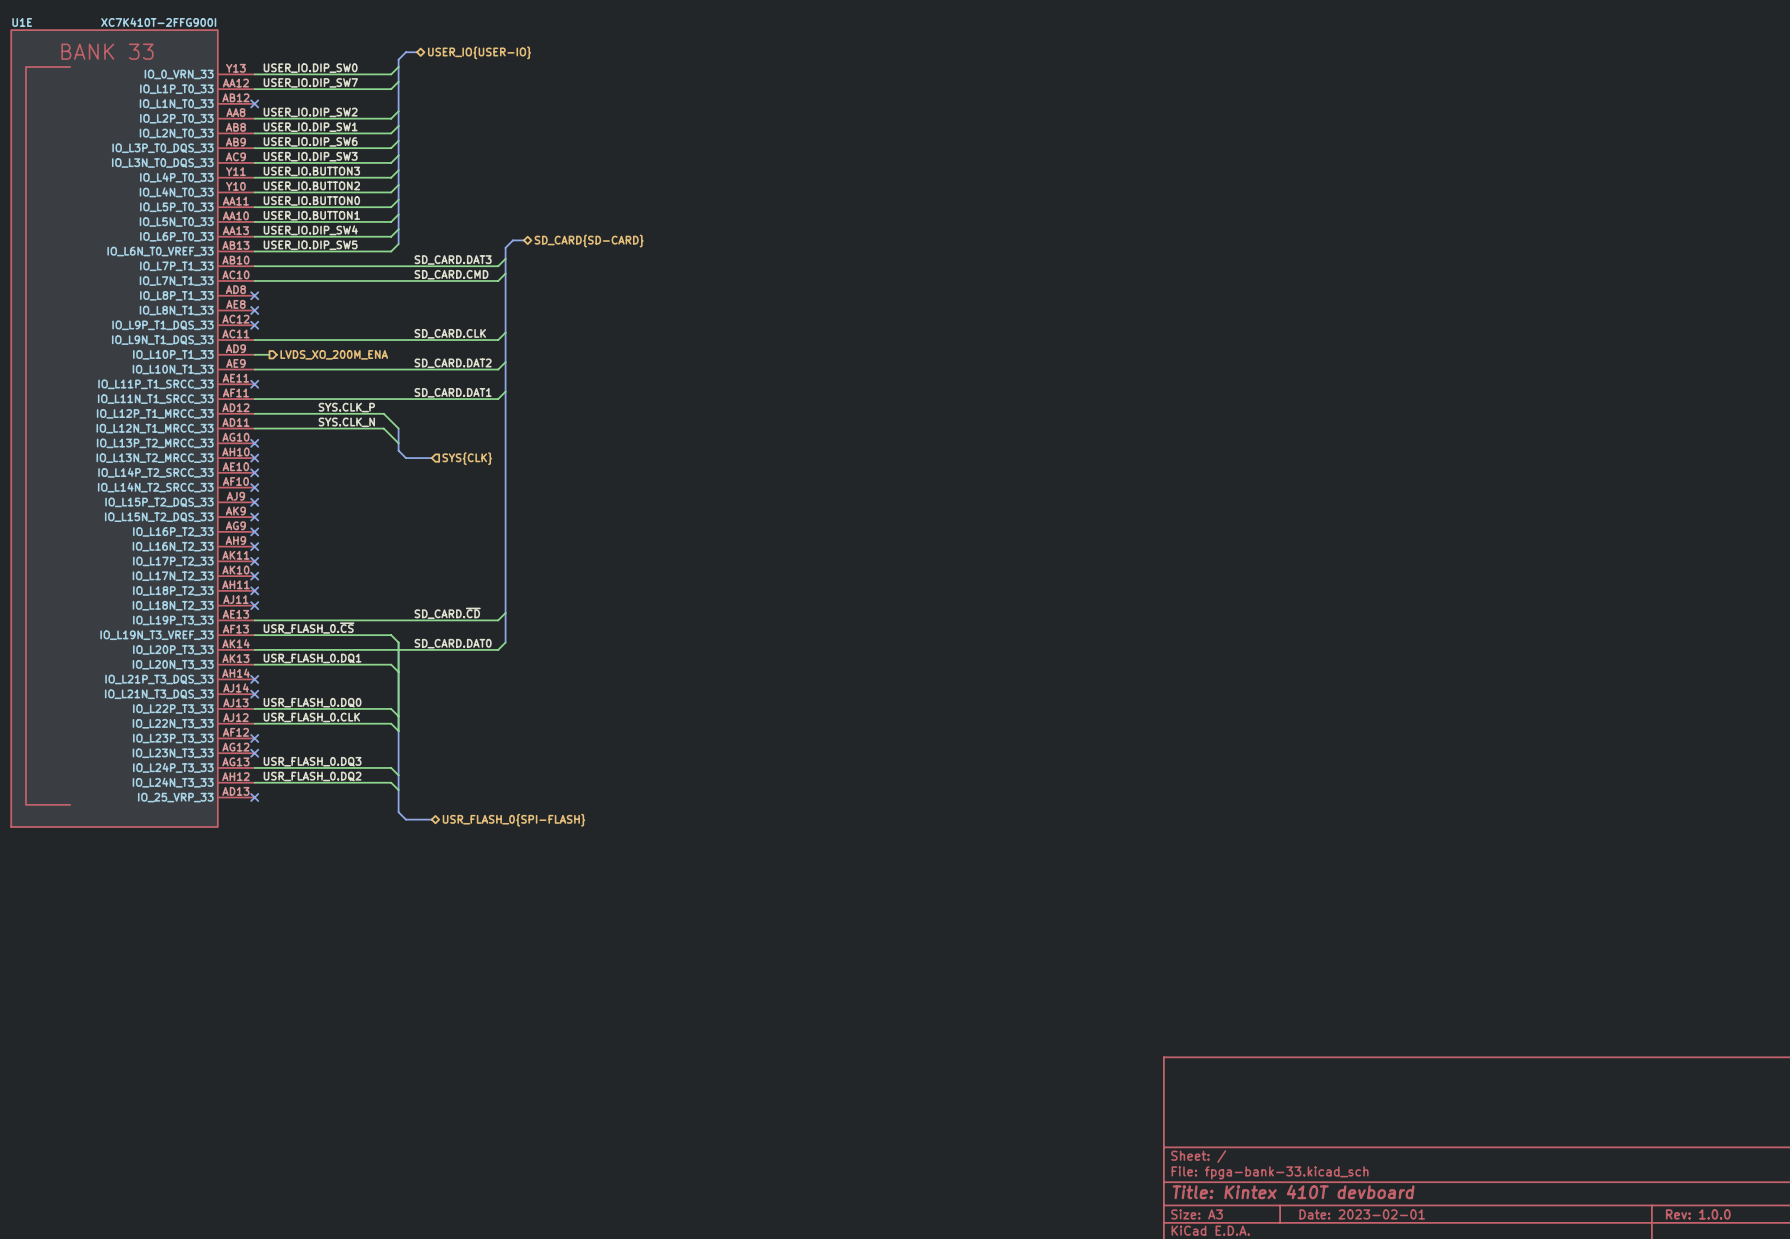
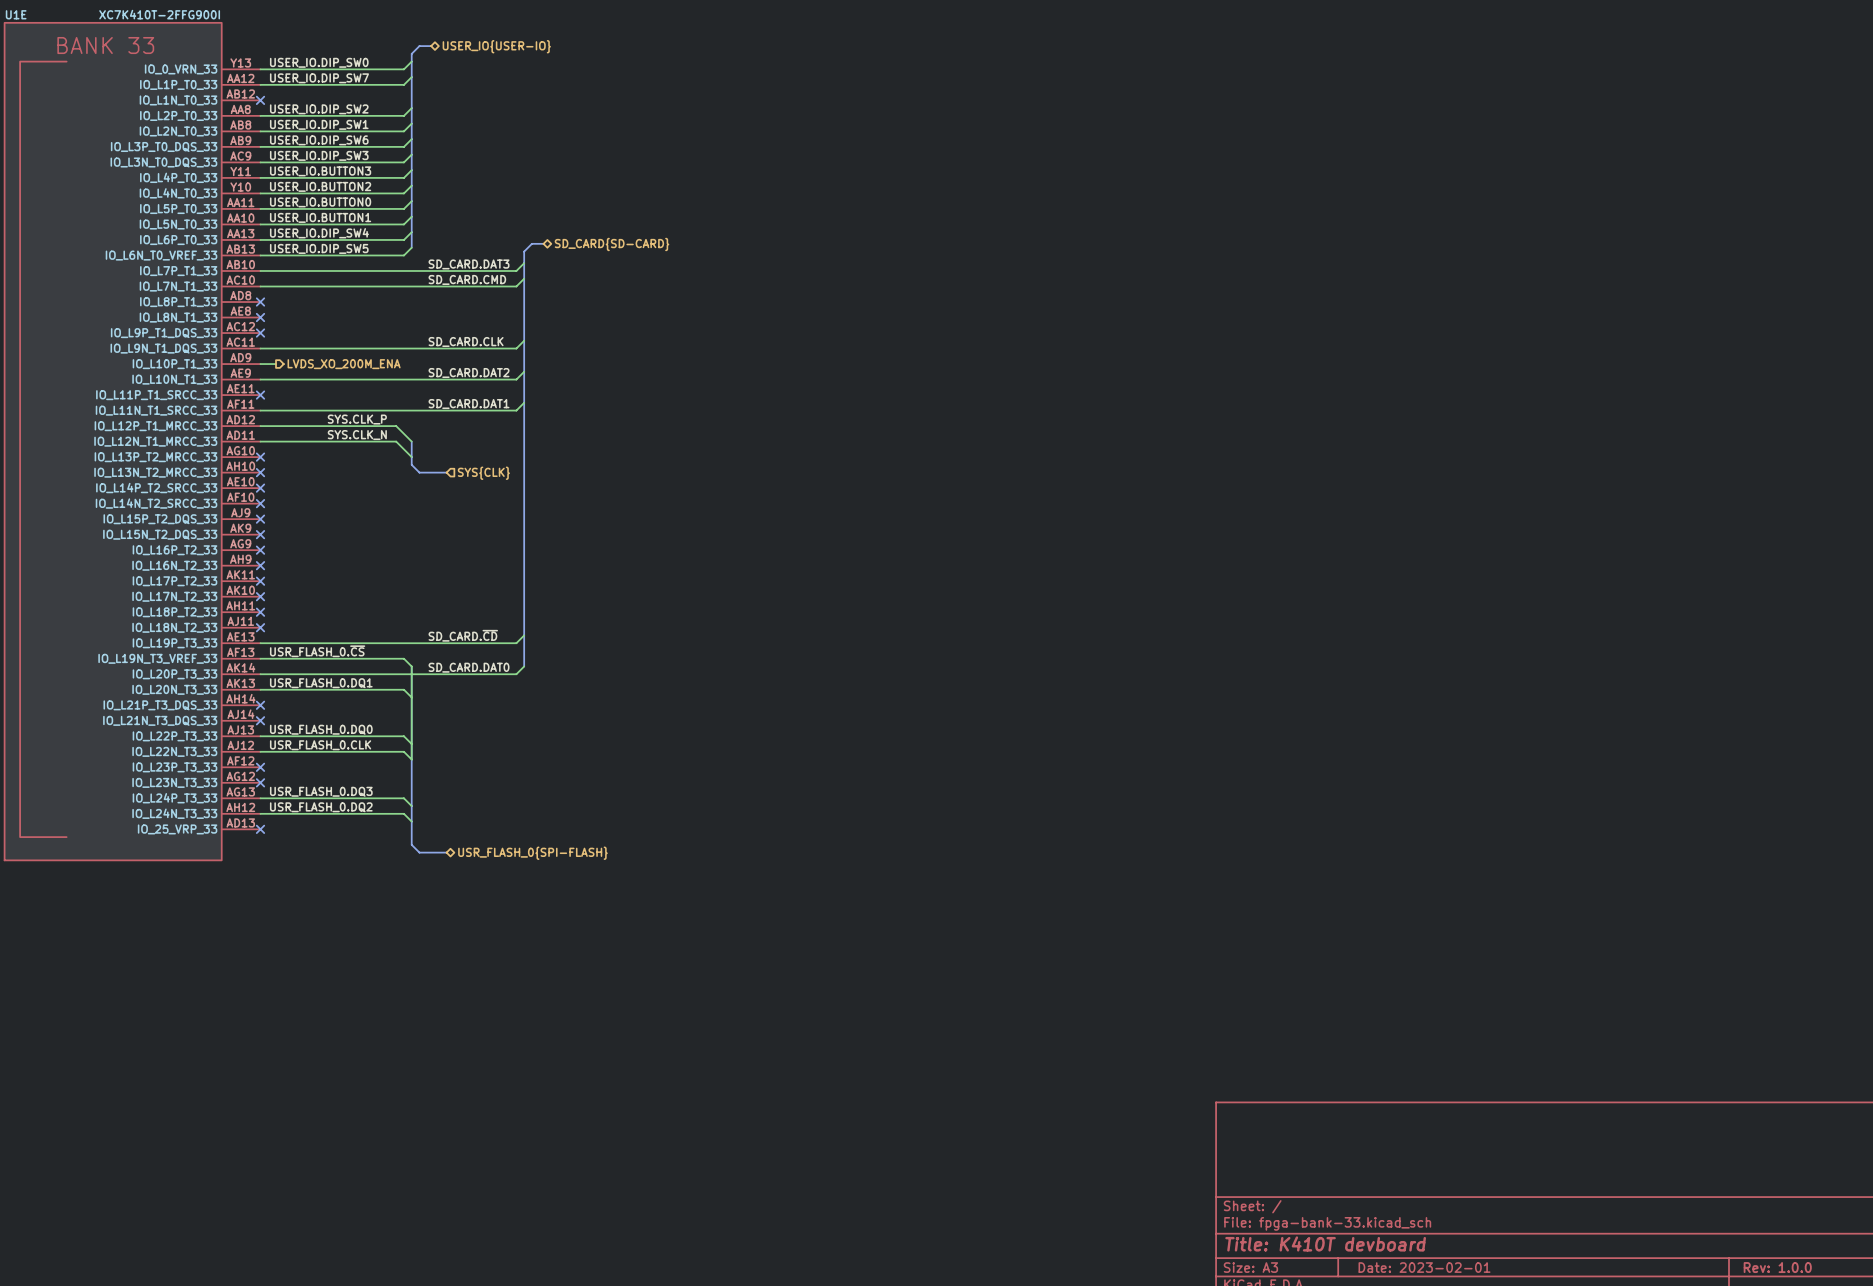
title block: Title: Kintex 410T devboard (1293, 1191) -> Title: K410T devboard (1325, 1243)

